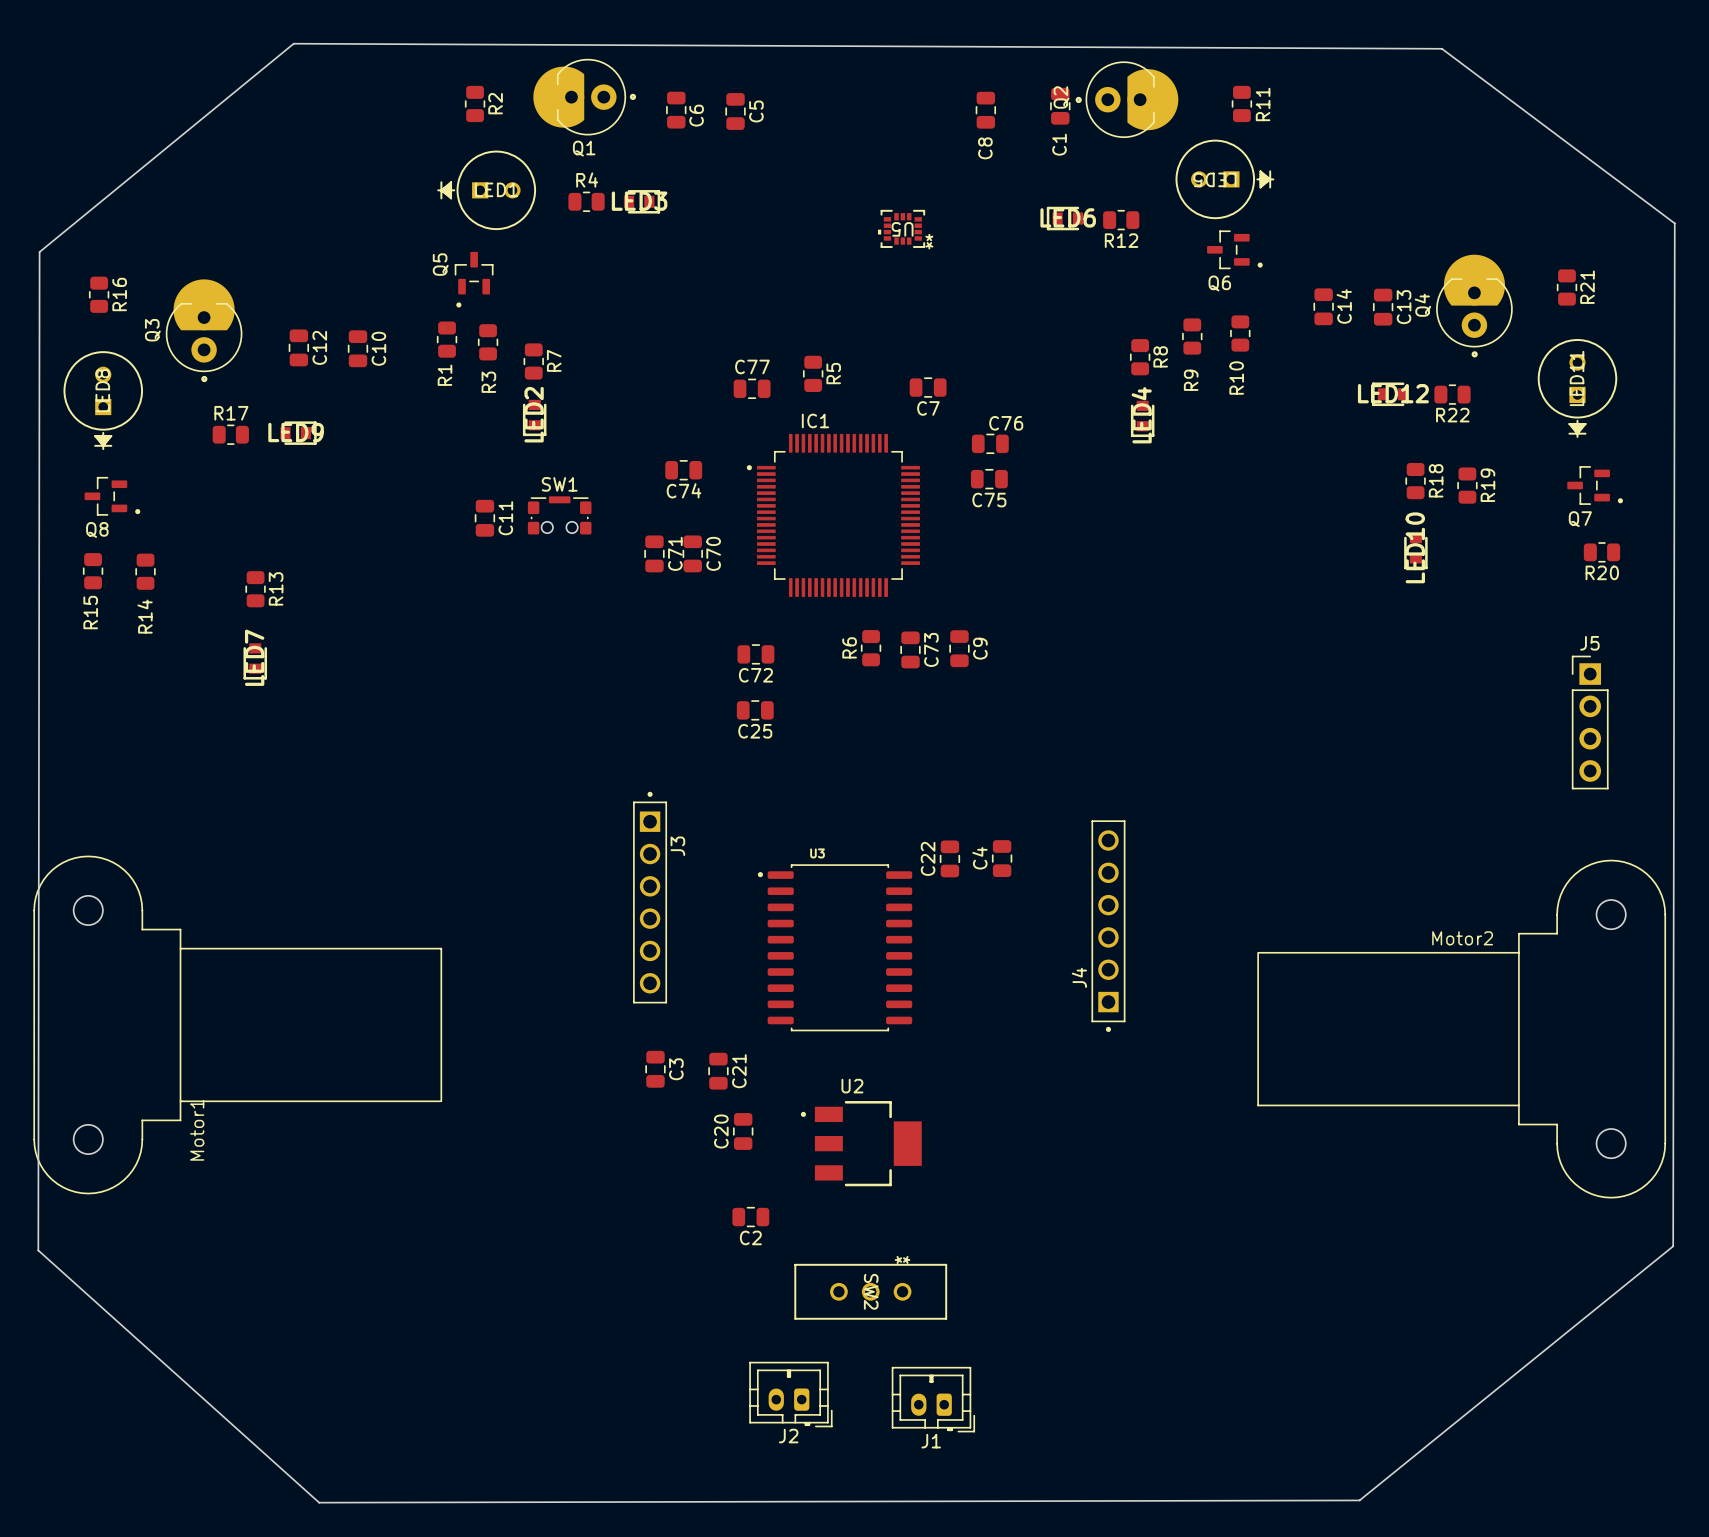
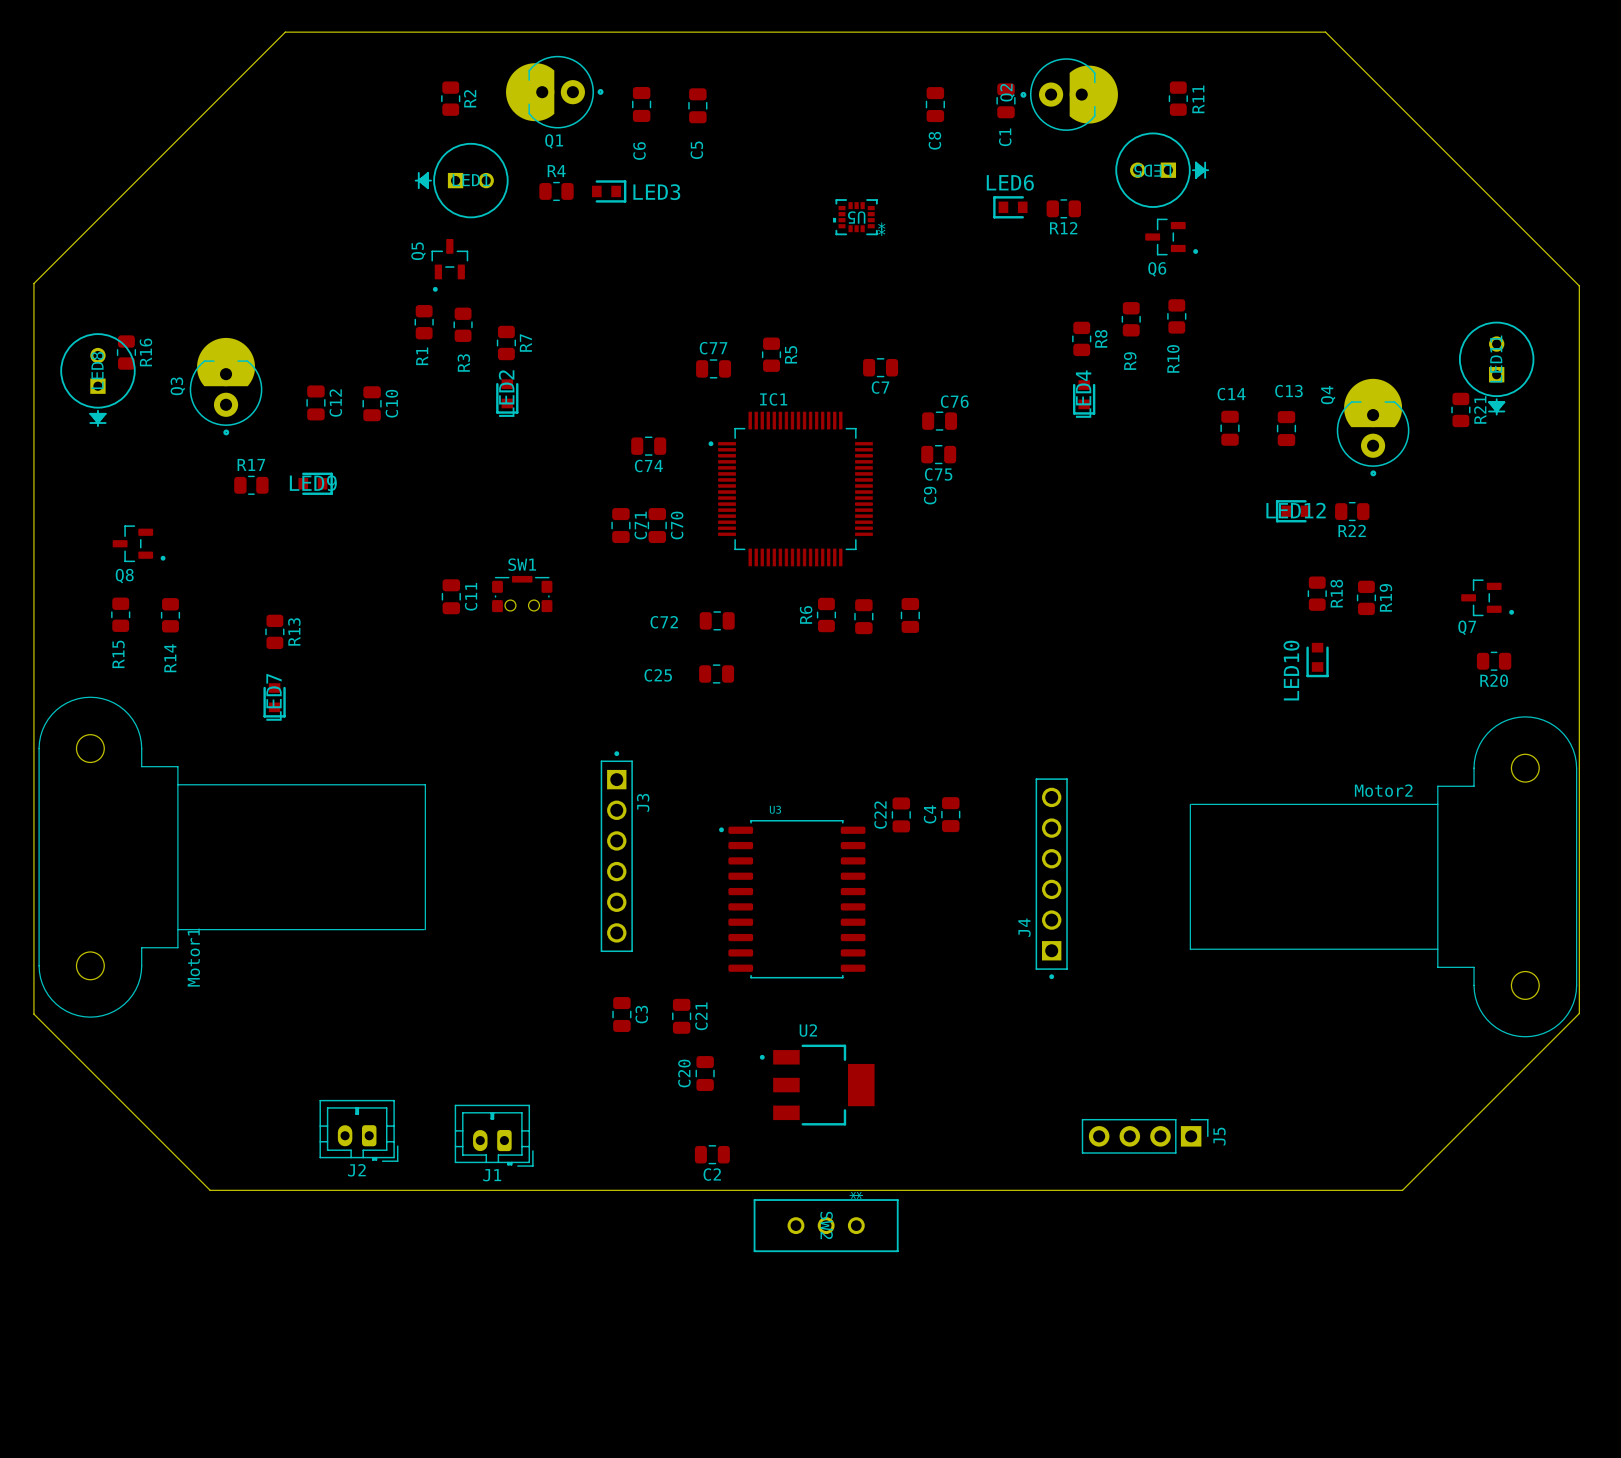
board edge: (293, 43) (1441, 48) (1674, 223) (1673, 1246) (1359, 1500) (319, 1502) (38, 1250) (39, 252) (293, 43) -> (285, 32) (33, 283) (33, 1014) (210, 1190) (1402, 1190) (1579, 1013) (1579, 285) (1325, 32) (285, 32)
C5 name position: C5 (756, 111) -> C5 (696, 150)
C6 name position: C6 (696, 115) -> C6 (639, 151)
LED3 name position: LED3 (639, 201) -> LED3 (656, 192)
LED6 name position: LED6 (1068, 217) -> LED6 (1010, 182)
R21 position: (1566, 287) -> (1460, 409)
R16 position: (99, 294) -> (126, 352)
Q4 name position: Q4 (1422, 305) -> Q4 (1328, 395)
C14 position: (1323, 306) -> (1230, 428)
C14 name rotation: 0° (1344, 306) -> 90° clockwise (1231, 394)
Q4 position: (1474, 306) -> (1373, 427)
C13 position: (1383, 307) -> (1286, 428)
C13 name rotation: 0° (1404, 307) -> 90° clockwise (1288, 391)
Q3 position: (204, 330) -> (226, 386)
C12 position: (298, 347) -> (315, 402)
C10 position: (357, 348) -> (372, 403)
LED12 position: (1390, 394) -> (1293, 511)
R22 position: (1452, 394) -> (1352, 511)
LED9 position: (298, 433) -> (315, 483)
R17 position: (230, 434) -> (251, 485)
R18 position: (1415, 481) -> (1317, 593)
R19 position: (1467, 485) -> (1366, 597)
Q7 position: (1595, 485) -> (1487, 597)
Q8 position: (112, 496) -> (139, 543)
SW1 position: (559, 515) -> (522, 594)
C11 position: (484, 518) -> (451, 596)
Q7 name position: Q7 (1580, 519) -> Q7 (1467, 627)
LED10 name position: LED10 (1415, 547) -> LED10 (1291, 670)
LED10 position: (1415, 551) -> (1317, 660)
R20 position: (1601, 552) -> (1494, 661)
R15 position: (93, 571) -> (120, 614)
R14 position: (145, 571) -> (170, 615)
R13 position: (255, 589) -> (274, 631)
C9 name position: C9 (980, 648) -> C9 (930, 495)
C73 name: C73 (931, 649) -> none
LED7 position: (255, 661) -> (274, 700)
C72 name position: C72 (755, 675) -> C72 (664, 622)
J5 rotation: 0° (1590, 722) -> 90° clockwise (1145, 1136)
J5 position: (1590, 722) -> (1145, 1136)
C25 name position: C25 (755, 731) -> C25 (658, 675)
Motor1 position: (237, 1024) -> (232, 857)
Motor2 position: (1461, 1029) -> (1383, 876)
J2 position: (790, 1394) -> (358, 1130)
J1 position: (933, 1399) -> (494, 1135)

